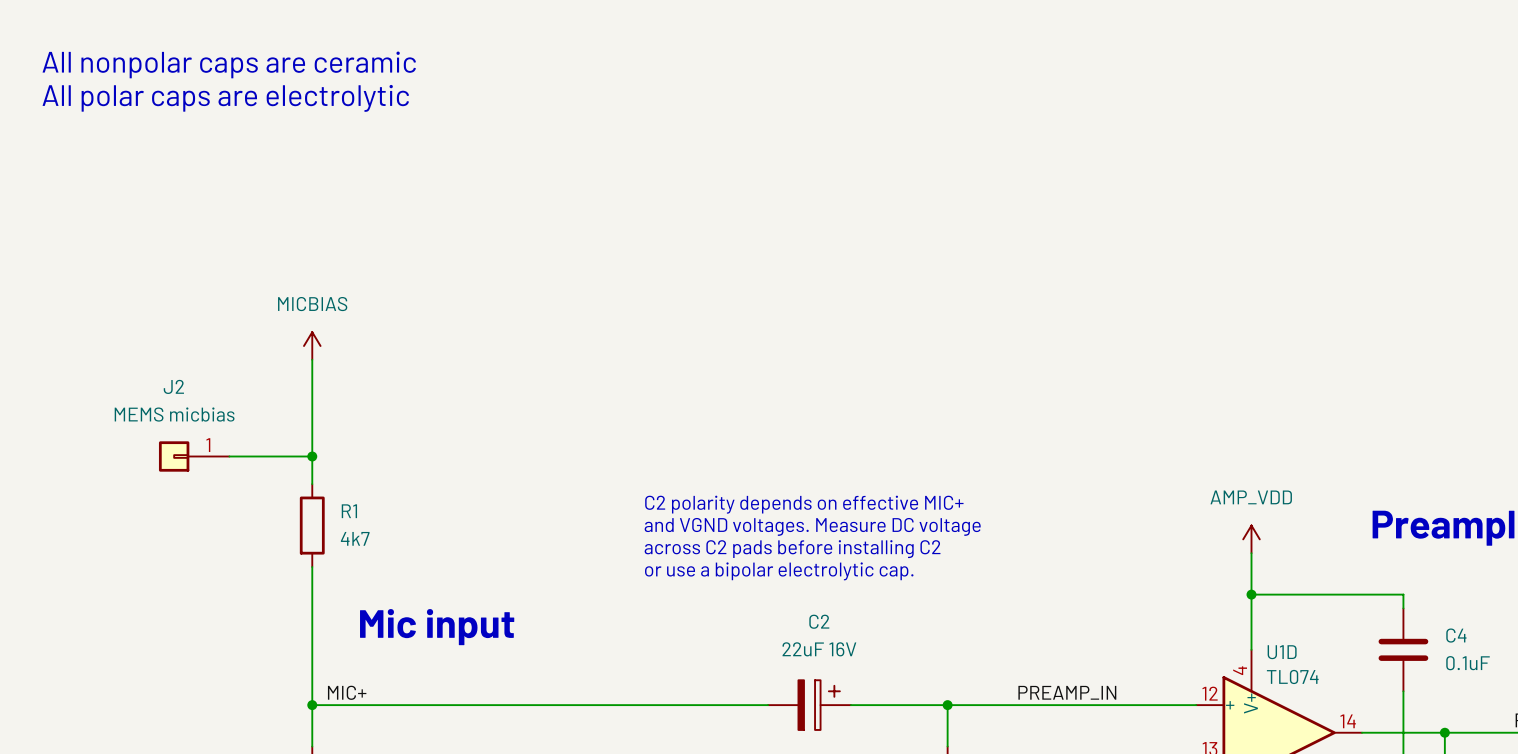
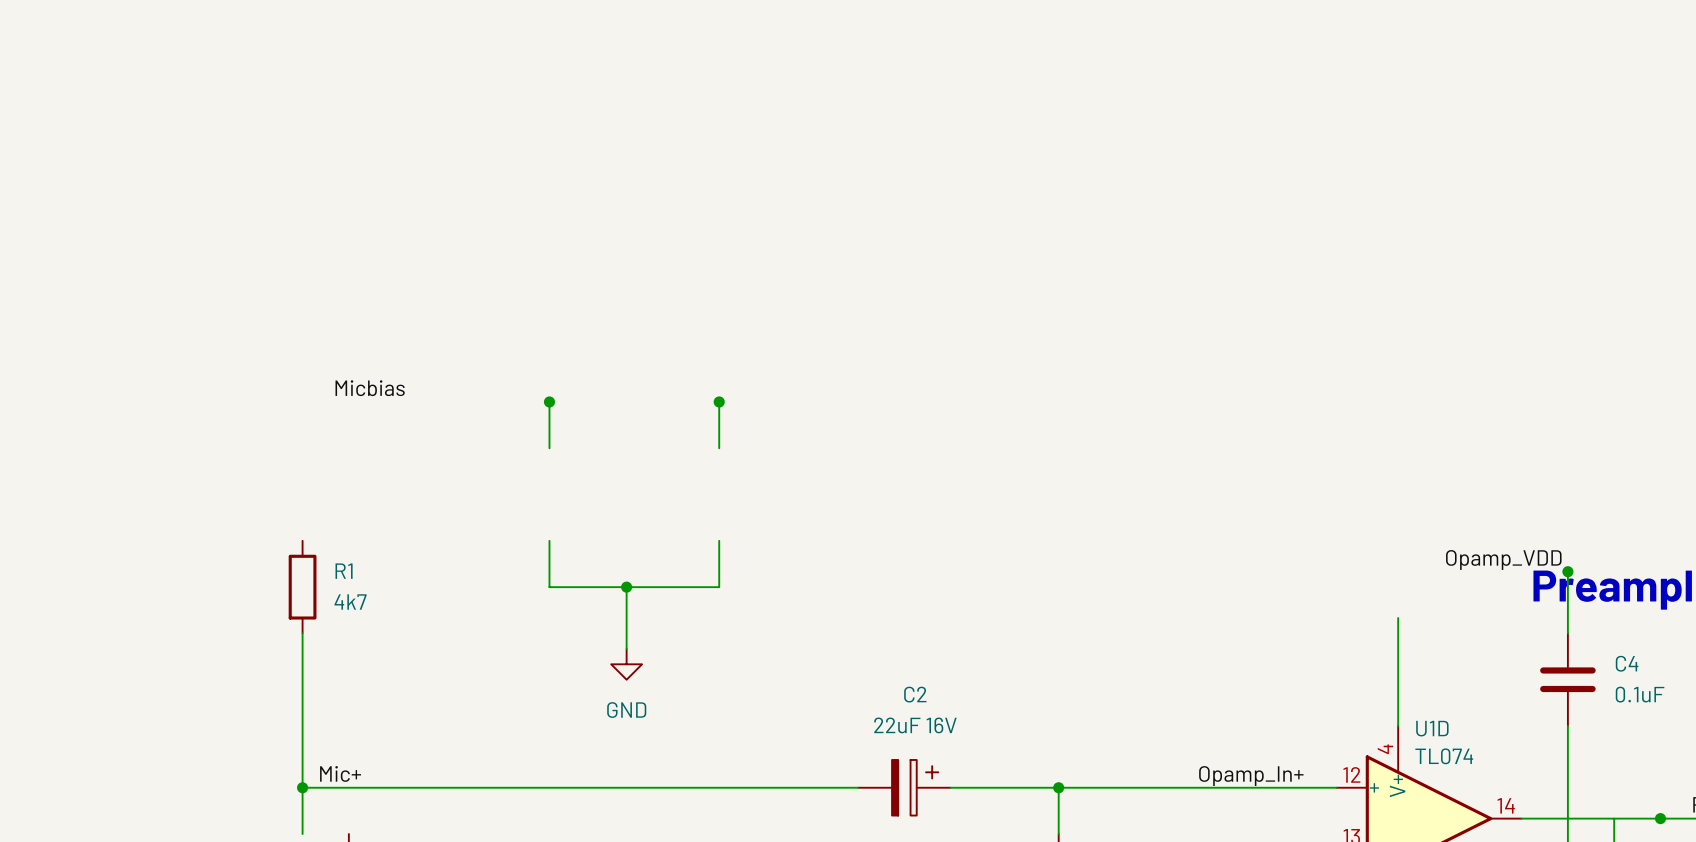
text: All nonpolar caps are ceramic (229, 64) -> none
text: All polar caps are electrolytic (225, 98) -> none
power symbol: MICBIAS (312, 346) -> none
label: none -> Micbias (370, 388)
wire: (312, 359) (312, 484) -> none
wire: none -> (549, 401) (549, 448)
junction: none -> (549, 401)
wire: none -> (719, 401) (719, 448)
junction: none -> (719, 401)
J2: MEMS micbias (194, 456) -> none
wire: (229, 456) (312, 456) -> none
junction: (312, 456) -> none
wire: none -> (549, 540) (549, 587) (719, 587) (719, 540)
label: none -> Opamp_VDD (1503, 560)
text: C2 polarity depends on effective MIC+ (804, 504) -> none
wire: none -> (1567, 571) (1567, 633)
junction: none -> (1567, 571)
R1 position: (312, 525) -> (302, 587)
wire: none -> (626, 587) (626, 648)
junction: none -> (626, 587)
text: and VGND voltages. Measure DC voltage (812, 526) -> none
power symbol: AMP_VDD (1251, 539) -> none
text: across C2 pads before installing C2 (792, 549) -> none
wire: (312, 566) (312, 746) -> (302, 633) (302, 834)
text: or use a bipolar electrolytic cap. (779, 571) -> none
power symbol: none -> GND (626, 664)
wire: (1251, 594) (1403, 594) (1403, 608) -> none
junction: (1251, 594) -> none
text: Mic input (437, 627) -> none
C4 position: (1403, 649) -> (1567, 679)
label: none -> Mic+ (340, 773)
label: MIC+ (347, 692) -> none
label: PREAMP_IN (1067, 692) -> none
label: none -> Opamp_In+ (1251, 776)
wire: none -> (302, 787) (348, 787)
junction position: (312, 705) -> (302, 787)
junction position: (1444, 732) -> (1660, 818)

